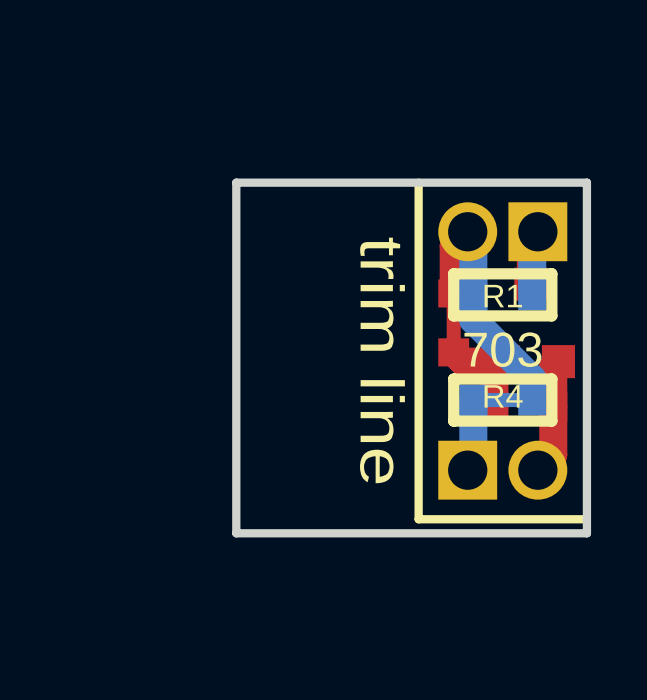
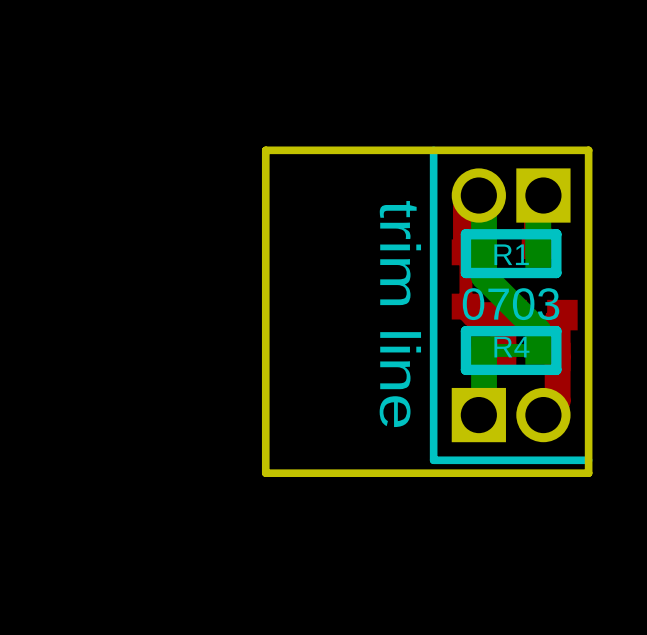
text: 703 (502, 349) -> 0703 (511, 304)

